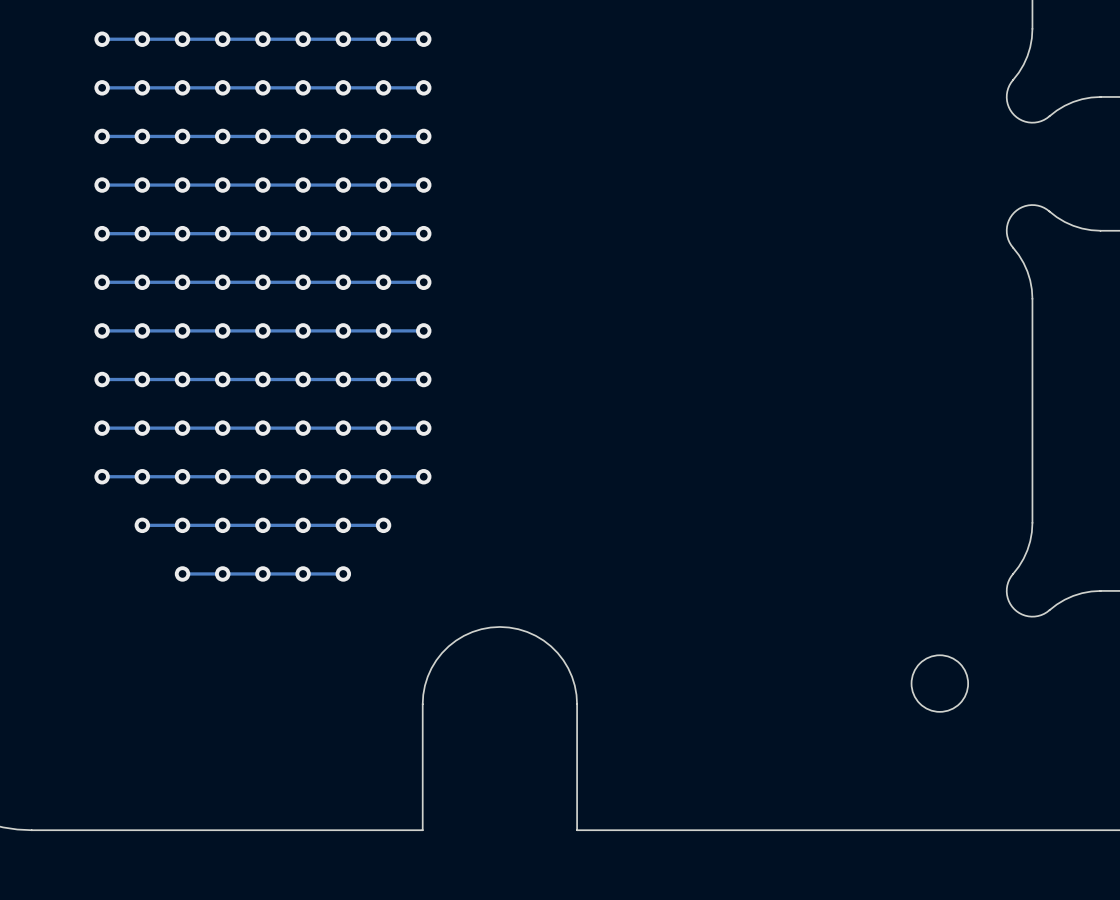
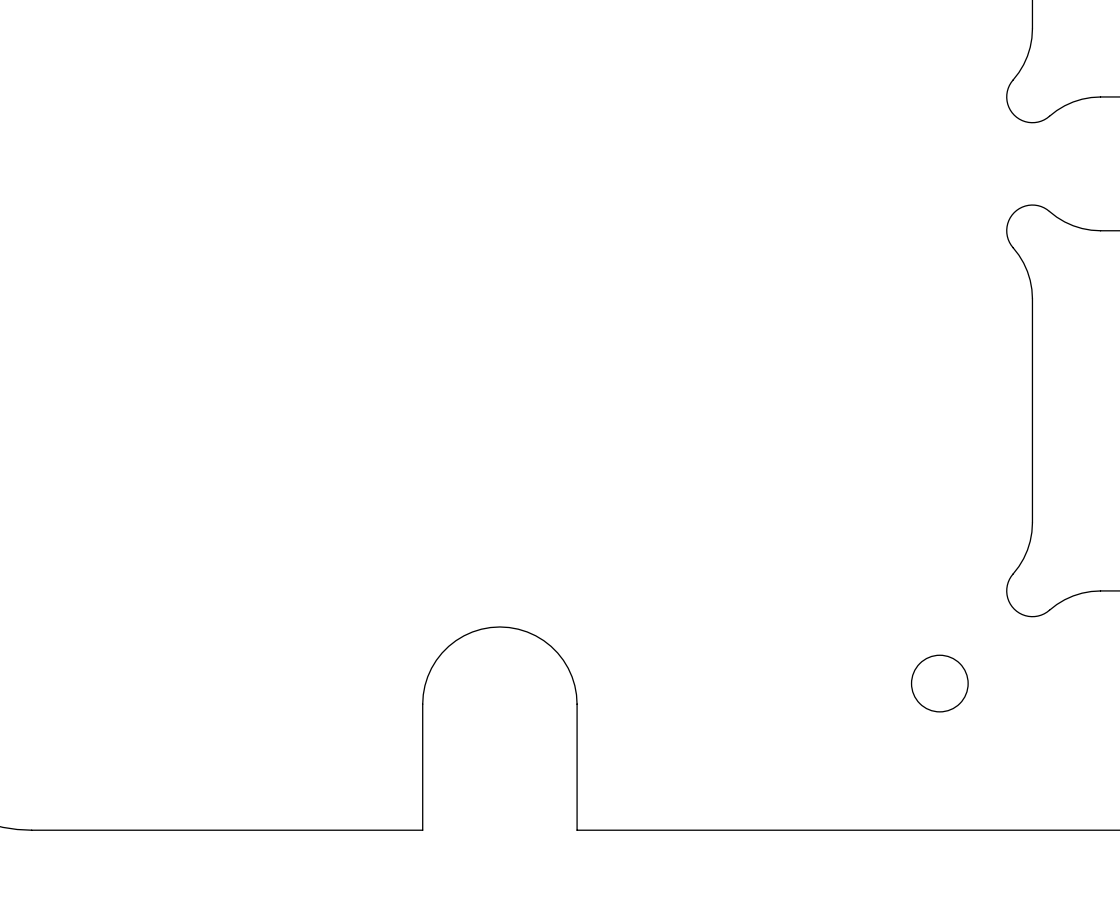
via: (102, 39) -> none
via: (142, 39) -> none
via: (182, 39) -> none
via: (222, 39) -> none
via: (262, 39) -> none
via: (303, 39) -> none
via: (343, 39) -> none
via: (383, 39) -> none
track: (423, 39) (102, 39) -> none
via: (423, 39) -> none
via: (102, 87) -> none
via: (142, 87) -> none
via: (182, 87) -> none
via: (222, 87) -> none
via: (262, 87) -> none
via: (303, 87) -> none
via: (343, 87) -> none
via: (383, 87) -> none
track: (423, 87) (102, 87) -> none
via: (423, 87) -> none
via: (102, 136) -> none
via: (142, 136) -> none
via: (182, 136) -> none
via: (222, 136) -> none
via: (262, 136) -> none
via: (303, 136) -> none
via: (343, 136) -> none
via: (383, 136) -> none
track: (423, 136) (102, 136) -> none
via: (423, 136) -> none
via: (102, 185) -> none
via: (142, 185) -> none
via: (182, 185) -> none
via: (222, 185) -> none
via: (262, 185) -> none
via: (303, 185) -> none
via: (343, 185) -> none
via: (383, 185) -> none
track: (423, 185) (102, 185) -> none
via: (423, 185) -> none
via: (102, 233) -> none
via: (142, 233) -> none
via: (182, 233) -> none
via: (222, 233) -> none
via: (262, 233) -> none
via: (303, 233) -> none
via: (343, 233) -> none
via: (383, 233) -> none
track: (423, 233) (102, 233) -> none
via: (423, 233) -> none
via: (102, 282) -> none
via: (142, 282) -> none
via: (182, 282) -> none
via: (222, 282) -> none
via: (262, 282) -> none
via: (303, 282) -> none
via: (343, 282) -> none
via: (383, 282) -> none
track: (423, 282) (102, 282) -> none
via: (423, 282) -> none
via: (102, 330) -> none
via: (142, 330) -> none
via: (182, 330) -> none
via: (222, 330) -> none
via: (262, 330) -> none
via: (303, 330) -> none
via: (343, 330) -> none
via: (383, 330) -> none
track: (423, 330) (102, 330) -> none
via: (423, 330) -> none
via: (102, 379) -> none
via: (142, 379) -> none
via: (182, 379) -> none
via: (222, 379) -> none
via: (262, 379) -> none
via: (303, 379) -> none
via: (343, 379) -> none
via: (383, 379) -> none
track: (423, 379) (102, 379) -> none
via: (423, 379) -> none
via: (102, 428) -> none
via: (142, 428) -> none
via: (182, 428) -> none
via: (222, 428) -> none
via: (262, 428) -> none
via: (303, 428) -> none
via: (343, 428) -> none
via: (383, 428) -> none
track: (423, 428) (102, 428) -> none
via: (423, 428) -> none
via: (102, 476) -> none
via: (142, 476) -> none
via: (182, 476) -> none
via: (222, 476) -> none
via: (262, 476) -> none
via: (303, 476) -> none
via: (343, 476) -> none
via: (383, 476) -> none
track: (423, 476) (102, 476) -> none
via: (423, 476) -> none
via: (142, 525) -> none
via: (182, 525) -> none
via: (222, 525) -> none
via: (262, 525) -> none
via: (303, 525) -> none
via: (343, 525) -> none
track: (383, 525) (142, 525) -> none
via: (383, 525) -> none
via: (182, 573) -> none
via: (222, 573) -> none
via: (262, 573) -> none
via: (303, 573) -> none
track: (343, 573) (182, 573) -> none
via: (343, 573) -> none

